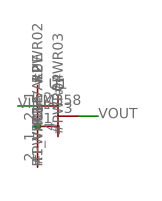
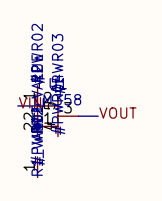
part symbol: [37, 126, 38, 168] -> [37, 116, 38, 178]

